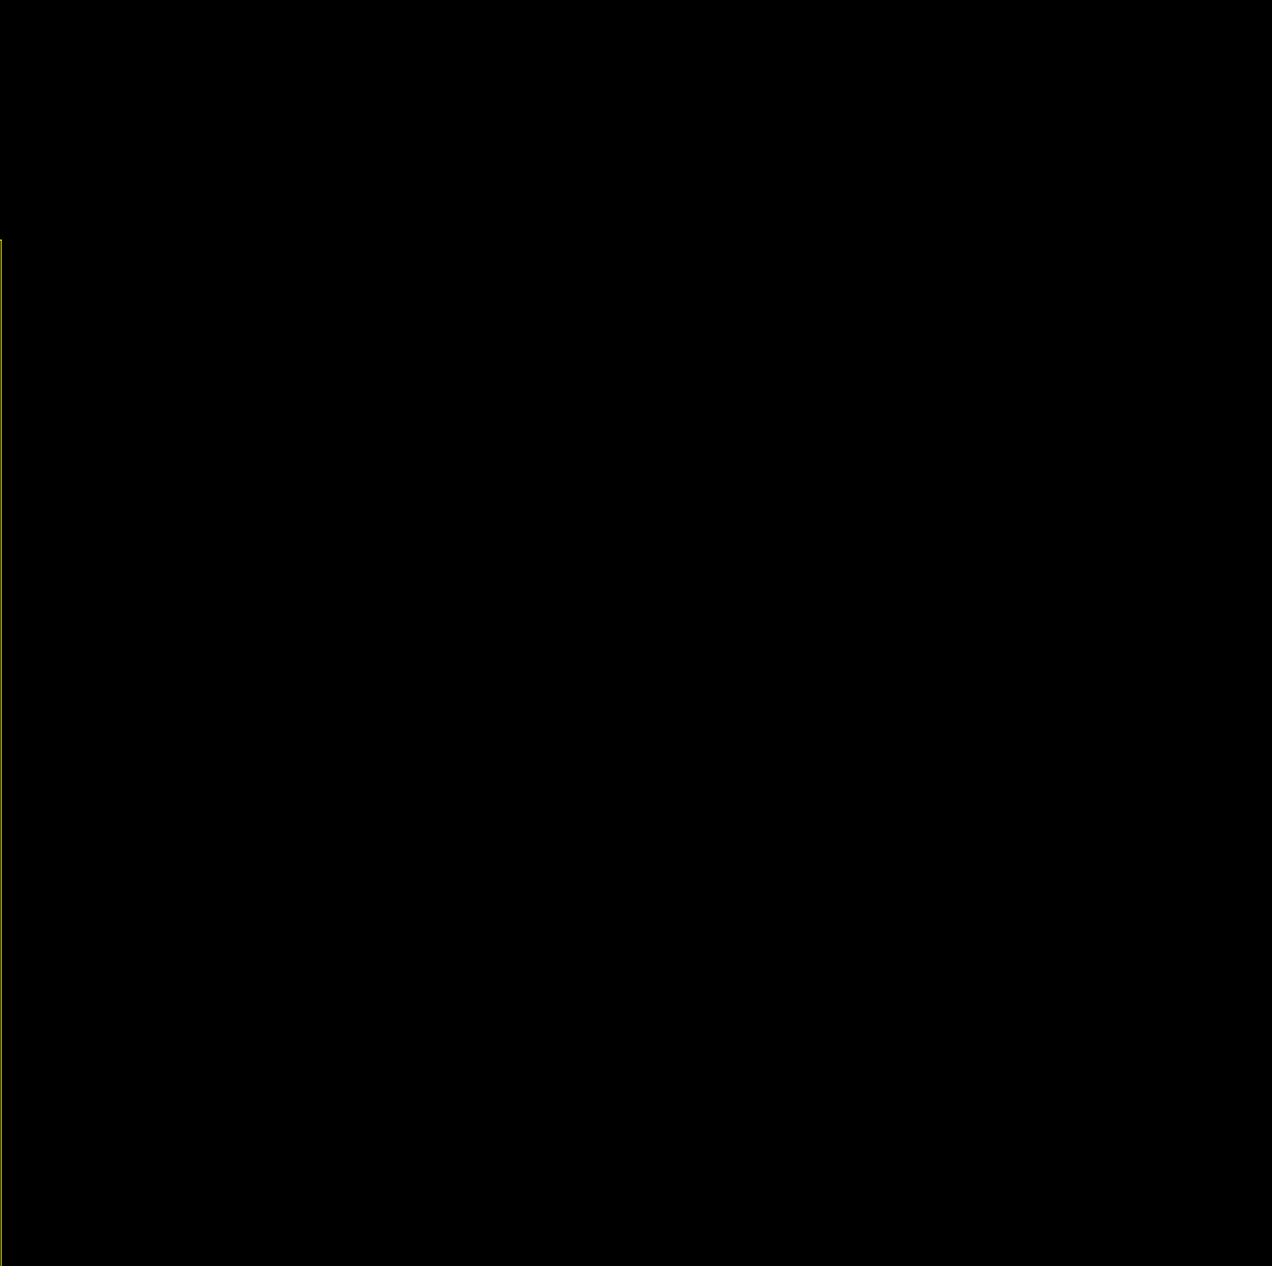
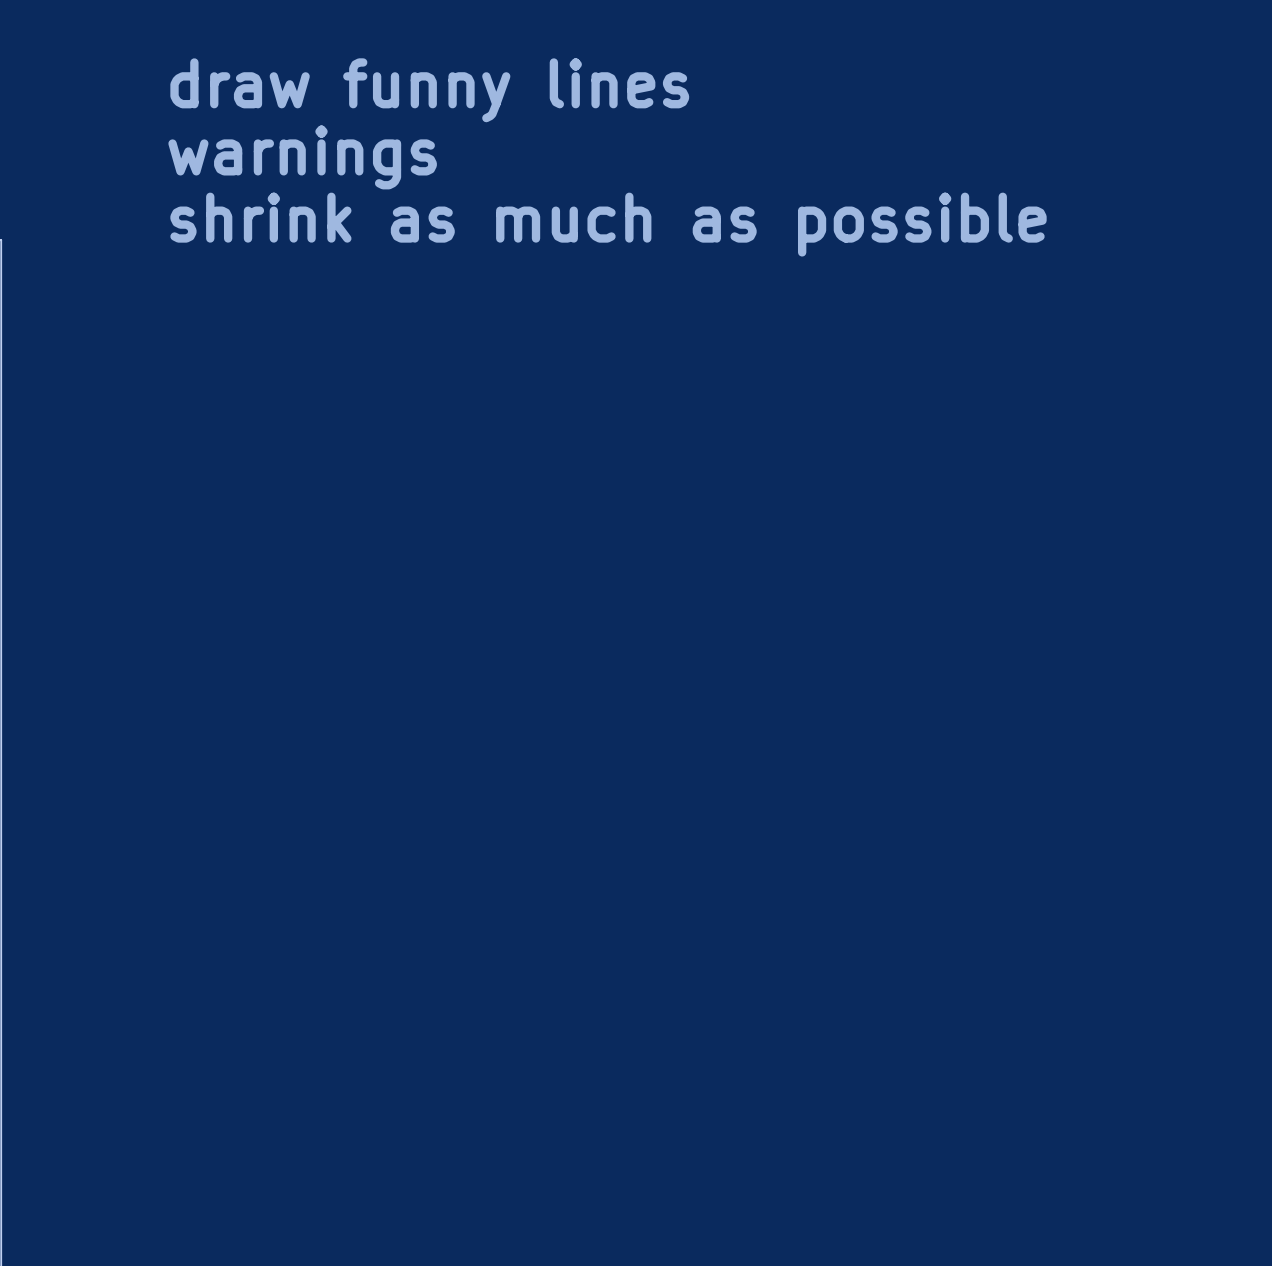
text: none -> draw funny lines (429, 90)
text: none -> warnings (302, 157)
text: none -> shrink as much as possible (608, 224)

